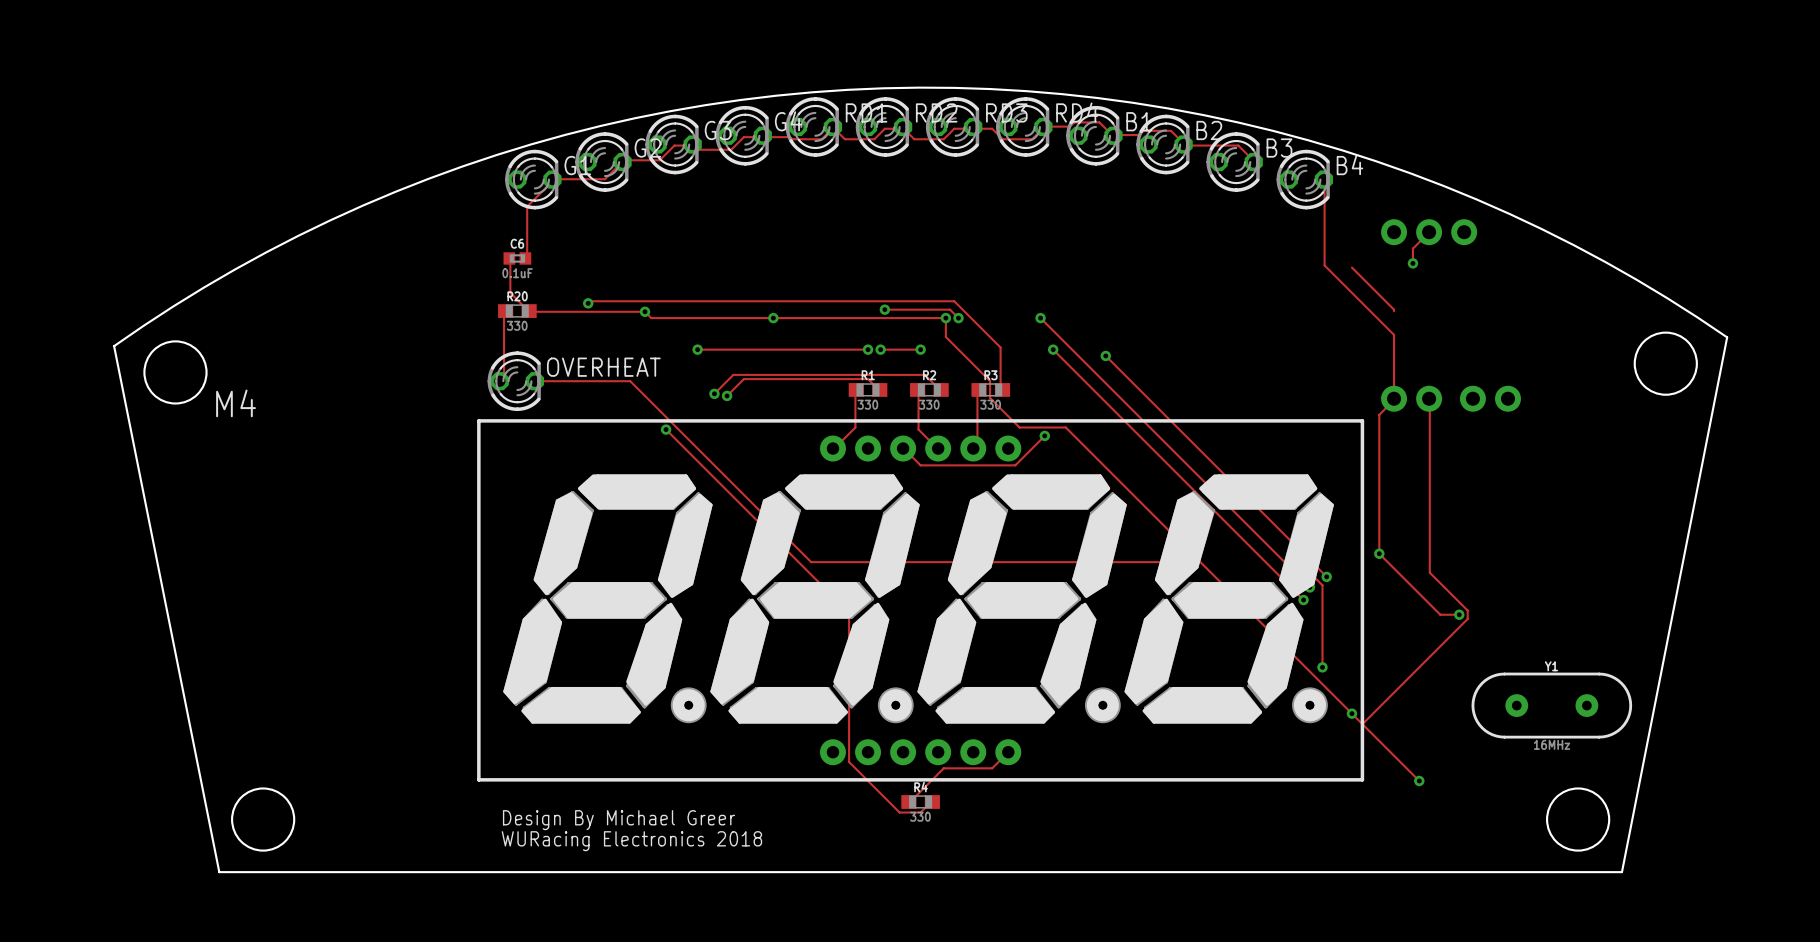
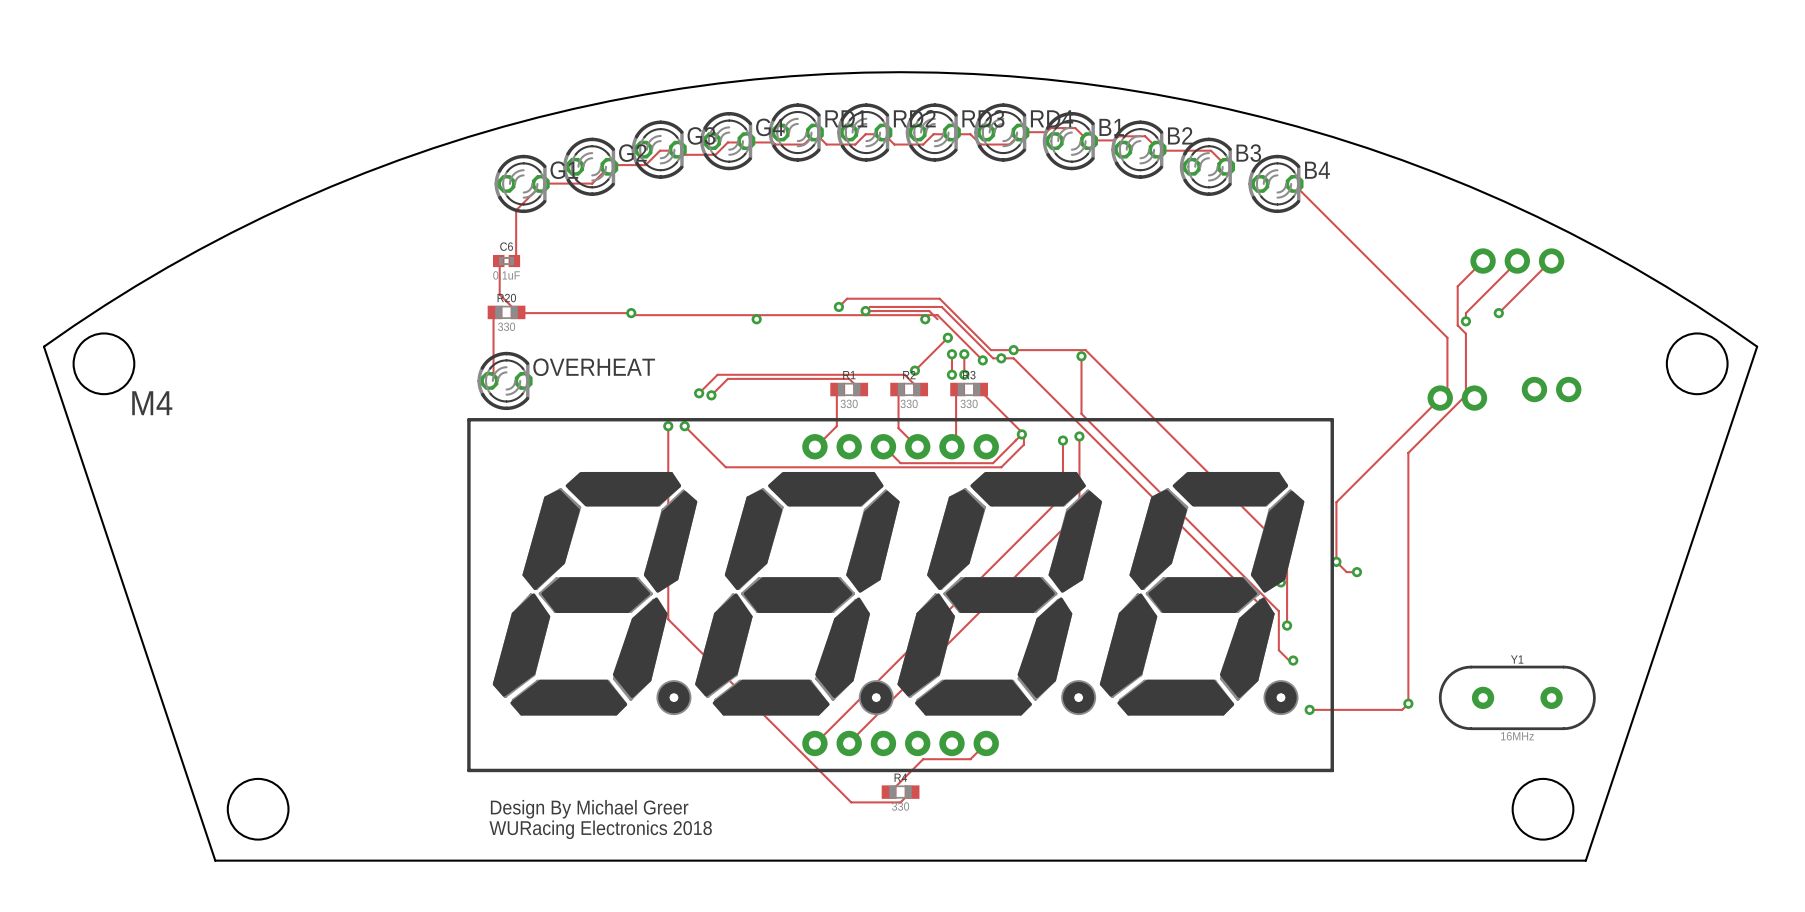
track: (1324, 181) (1324, 265) (1394, 334) (1394, 400) (1379, 414) (1379, 553) (1440, 614) (1459, 614) -> (1295, 185) (1447, 337) (1448, 389) (1336, 502) (1336, 561) (1346, 572) (1356, 572)
track: (1429, 232) (1412, 248) (1412, 263) -> none
part position: (1429, 232) -> (1517, 261)
track: none -> (1483, 261) (1457, 286) (1457, 325) (1465, 333) (1465, 395) (1408, 452) (1408, 703) (1402, 709) (1309, 709)
track: none -> (1517, 261) (1465, 313) (1465, 321)
track: none -> (1551, 261) (1498, 313)
via: (1412, 263) -> none
track: (1351, 267) (1394, 311) -> none
track: (588, 303) (590, 301) (954, 301) (1000, 347) (1000, 389) (1002, 389) -> (684, 426) (725, 467) (1001, 467) (1023, 444) (1023, 434) (980, 389)
via: (588, 303) -> none
track: none -> (838, 306) (847, 298) (939, 298) (991, 350) (1085, 350) (1287, 551) (1287, 625)
via: none -> (838, 306)
track: none -> (869, 306) (941, 306) (993, 358) (1013, 358) (1262, 607)
via: none -> (1498, 313)
track: (647, 313) (651, 318) (945, 318) (945, 337) (990, 381) (990, 398) (1019, 427) (1065, 427) (1419, 780) -> (633, 315) (937, 315) (982, 360)
via: (958, 318) -> none
track: (1040, 318) (1309, 587) -> none
via: (1040, 318) -> none
via: none -> (1465, 321)
track: none -> (947, 337) (914, 370)
via: none -> (947, 337)
track: (697, 349) (868, 349) -> none
via: (697, 349) -> none
via: (868, 349) -> none
track: (880, 349) (920, 349) -> none
via: (880, 349) -> none
via: (920, 349) -> none
via: none -> (1013, 350)
track: (1053, 349) (1303, 600) -> none
via: (1053, 349) -> none
track: none -> (951, 354) (951, 374)
via: none -> (951, 354)
track: none -> (964, 354) (964, 374)
via: none -> (964, 354)
track: (1105, 355) (1326, 576) -> none
via: none -> (1001, 358)
track: none -> (1081, 358) (1081, 413) (1278, 611) (1278, 650) (1289, 660)
via: none -> (982, 360)
round board edge position: (1665, 363) -> (1697, 363)
via: none -> (914, 370)
round board edge position: (175, 372) -> (103, 363)
via: none -> (951, 374)
via: none -> (964, 374)
track: (534, 381) (630, 381) (811, 562) (1166, 562) -> none
part position: (1411, 398) -> (1551, 389)
track: (1429, 398) (1429, 572) (1467, 610) (1467, 618) (1362, 724) -> none
text position: M4 (236, 403) -> M4 (152, 403)
via: none -> (668, 426)
via: none -> (684, 426)
track: (666, 429) (849, 612) (849, 762) (899, 812) -> (668, 426) (668, 619) (851, 802) (880, 802)
via: (666, 429) -> none
track: none -> (1079, 436) (1079, 512) (849, 743)
via: none -> (1079, 436)
track: none -> (1062, 440) (1062, 496) (814, 743)
via: none -> (1062, 440)
via: (1379, 553) -> none
track: (1295, 557) (1322, 585) (1322, 667) -> none
via: none -> (1336, 561)
via: (1326, 576) -> none
via: none -> (1356, 572)
via: (1303, 600) -> none
via: (1459, 614) -> none
via: none -> (1287, 625)
via: none -> (1408, 703)
via position: (1351, 713) -> (1309, 709)
via: (1419, 780) -> none
board edge: (219, 872) (114, 346) (204, 287) (298, 235) (395, 191) (496, 154) (600, 126) (705, 105) (812, 92) (919, 87) (1026, 91) (1133, 102) (1238, 122) (1342, 150) (1443, 185) (1541, 229) (1636, 279) (1727, 337) (1621, 872) -> (215, 860) (43, 346) (135, 286) (231, 232) (330, 186) (433, 148) (538, 117) (609, 101) (682, 88) (790, 76) (900, 72) (1010, 76) (1119, 88) (1191, 101) (1262, 117) (1367, 148) (1470, 186) (1569, 232) (1665, 286) (1757, 346) (1585, 860)

